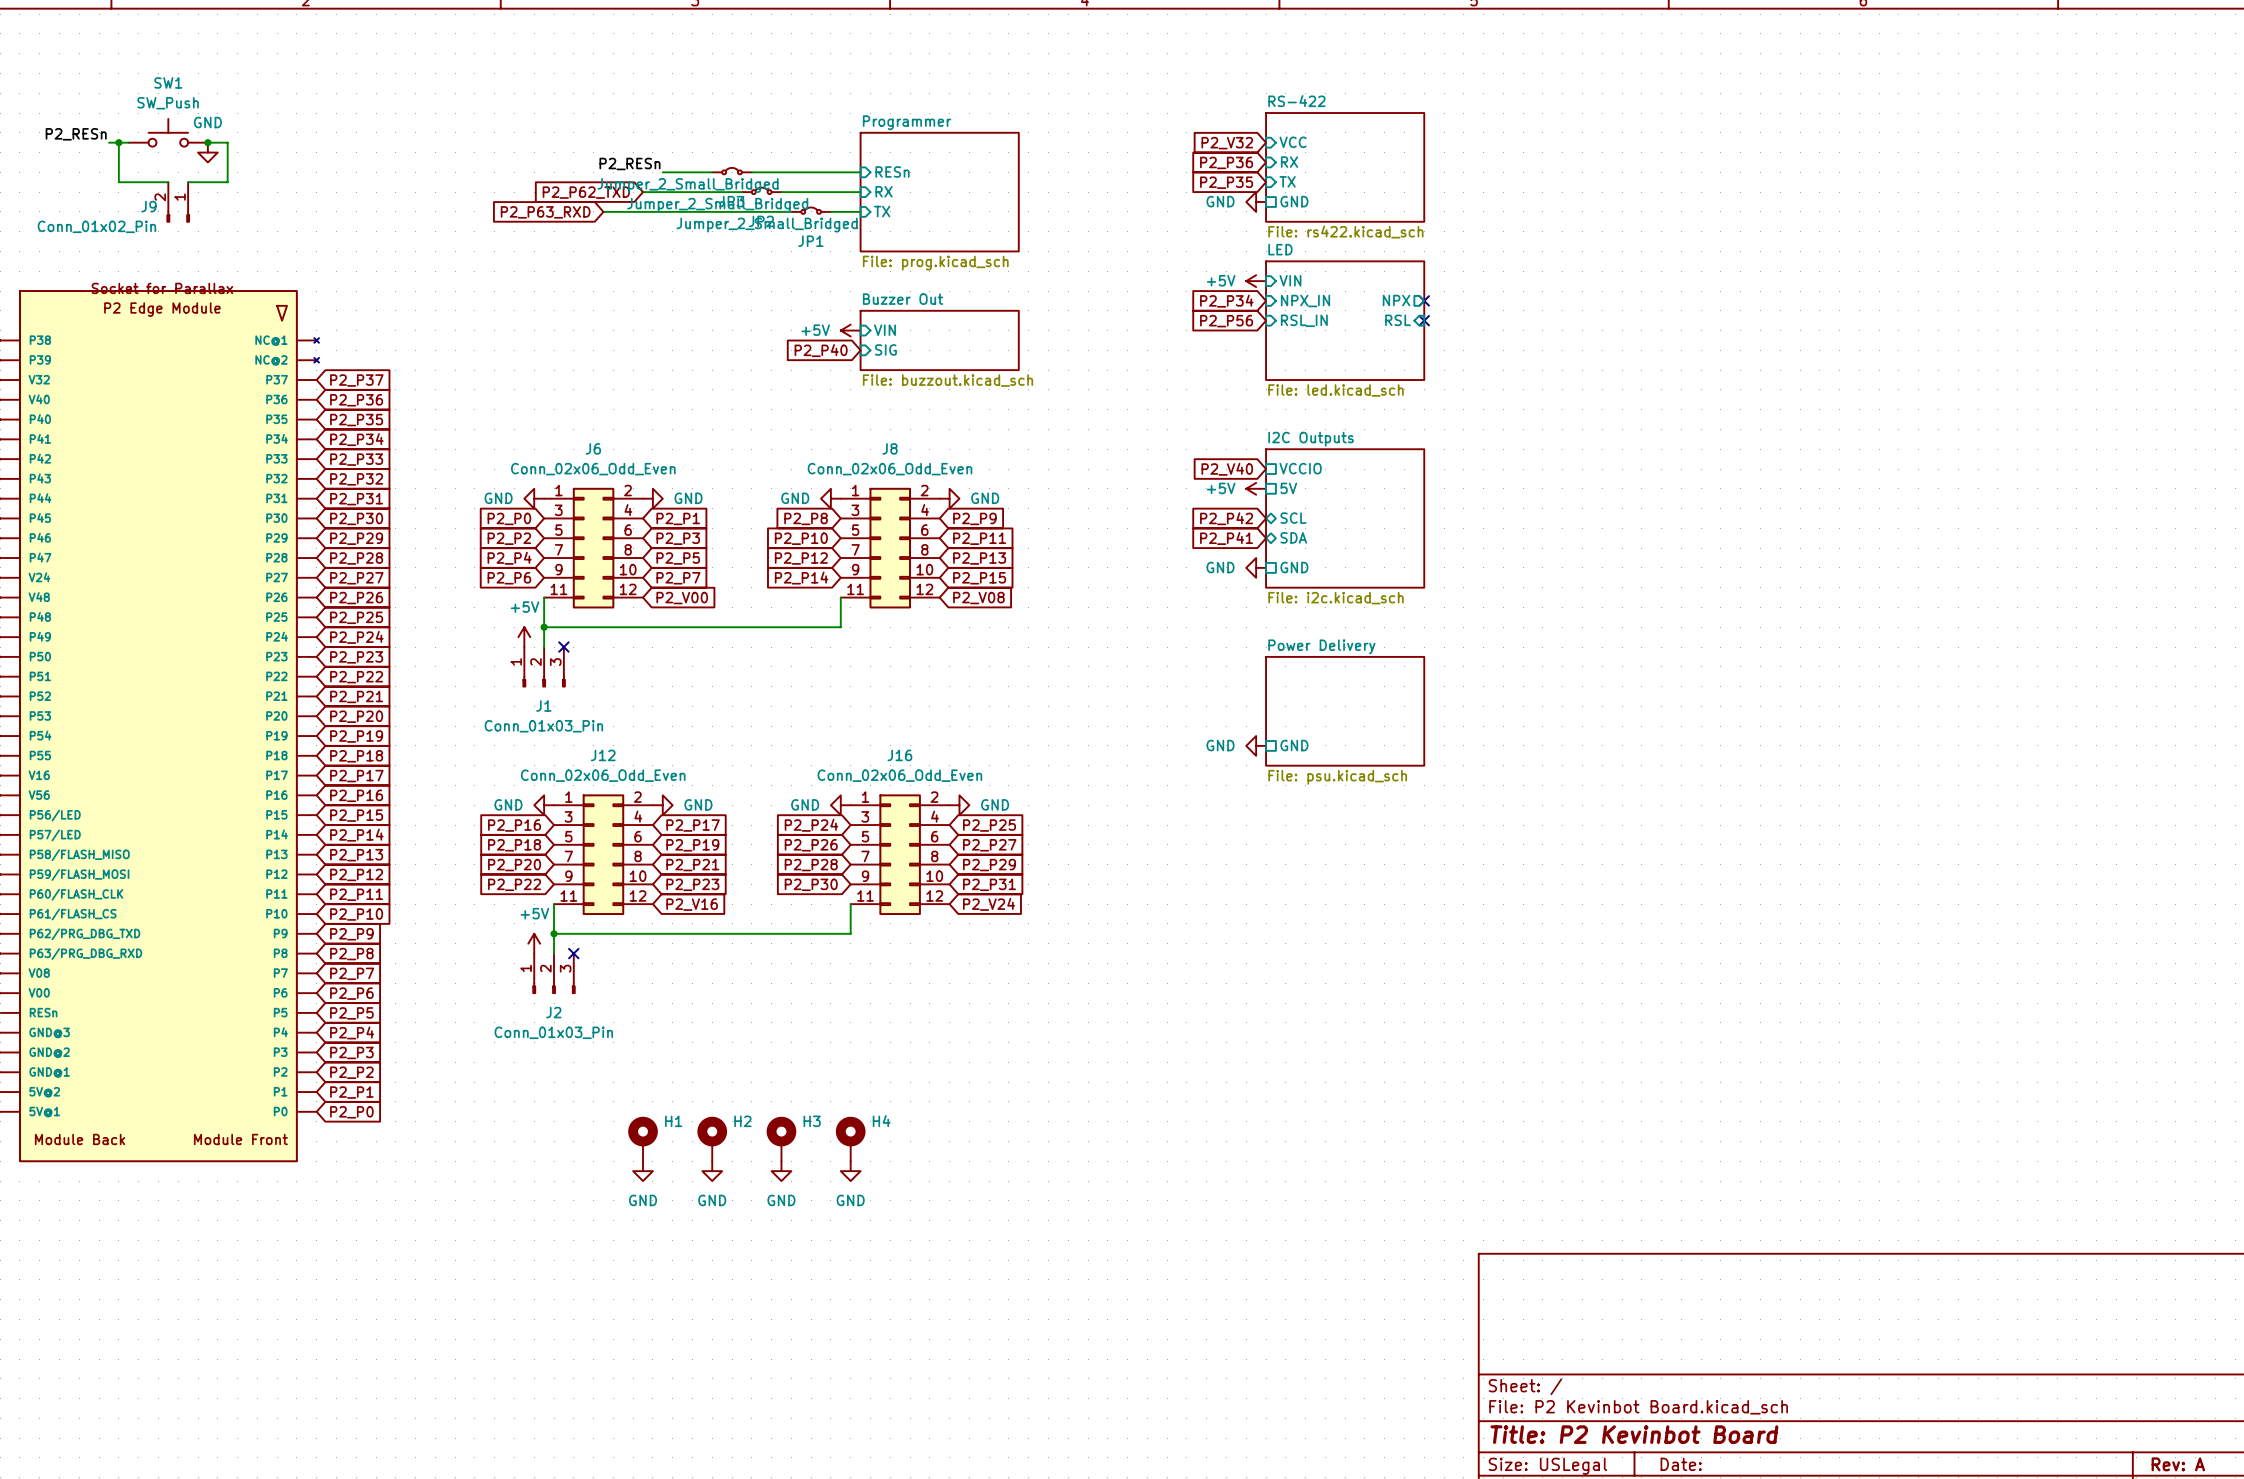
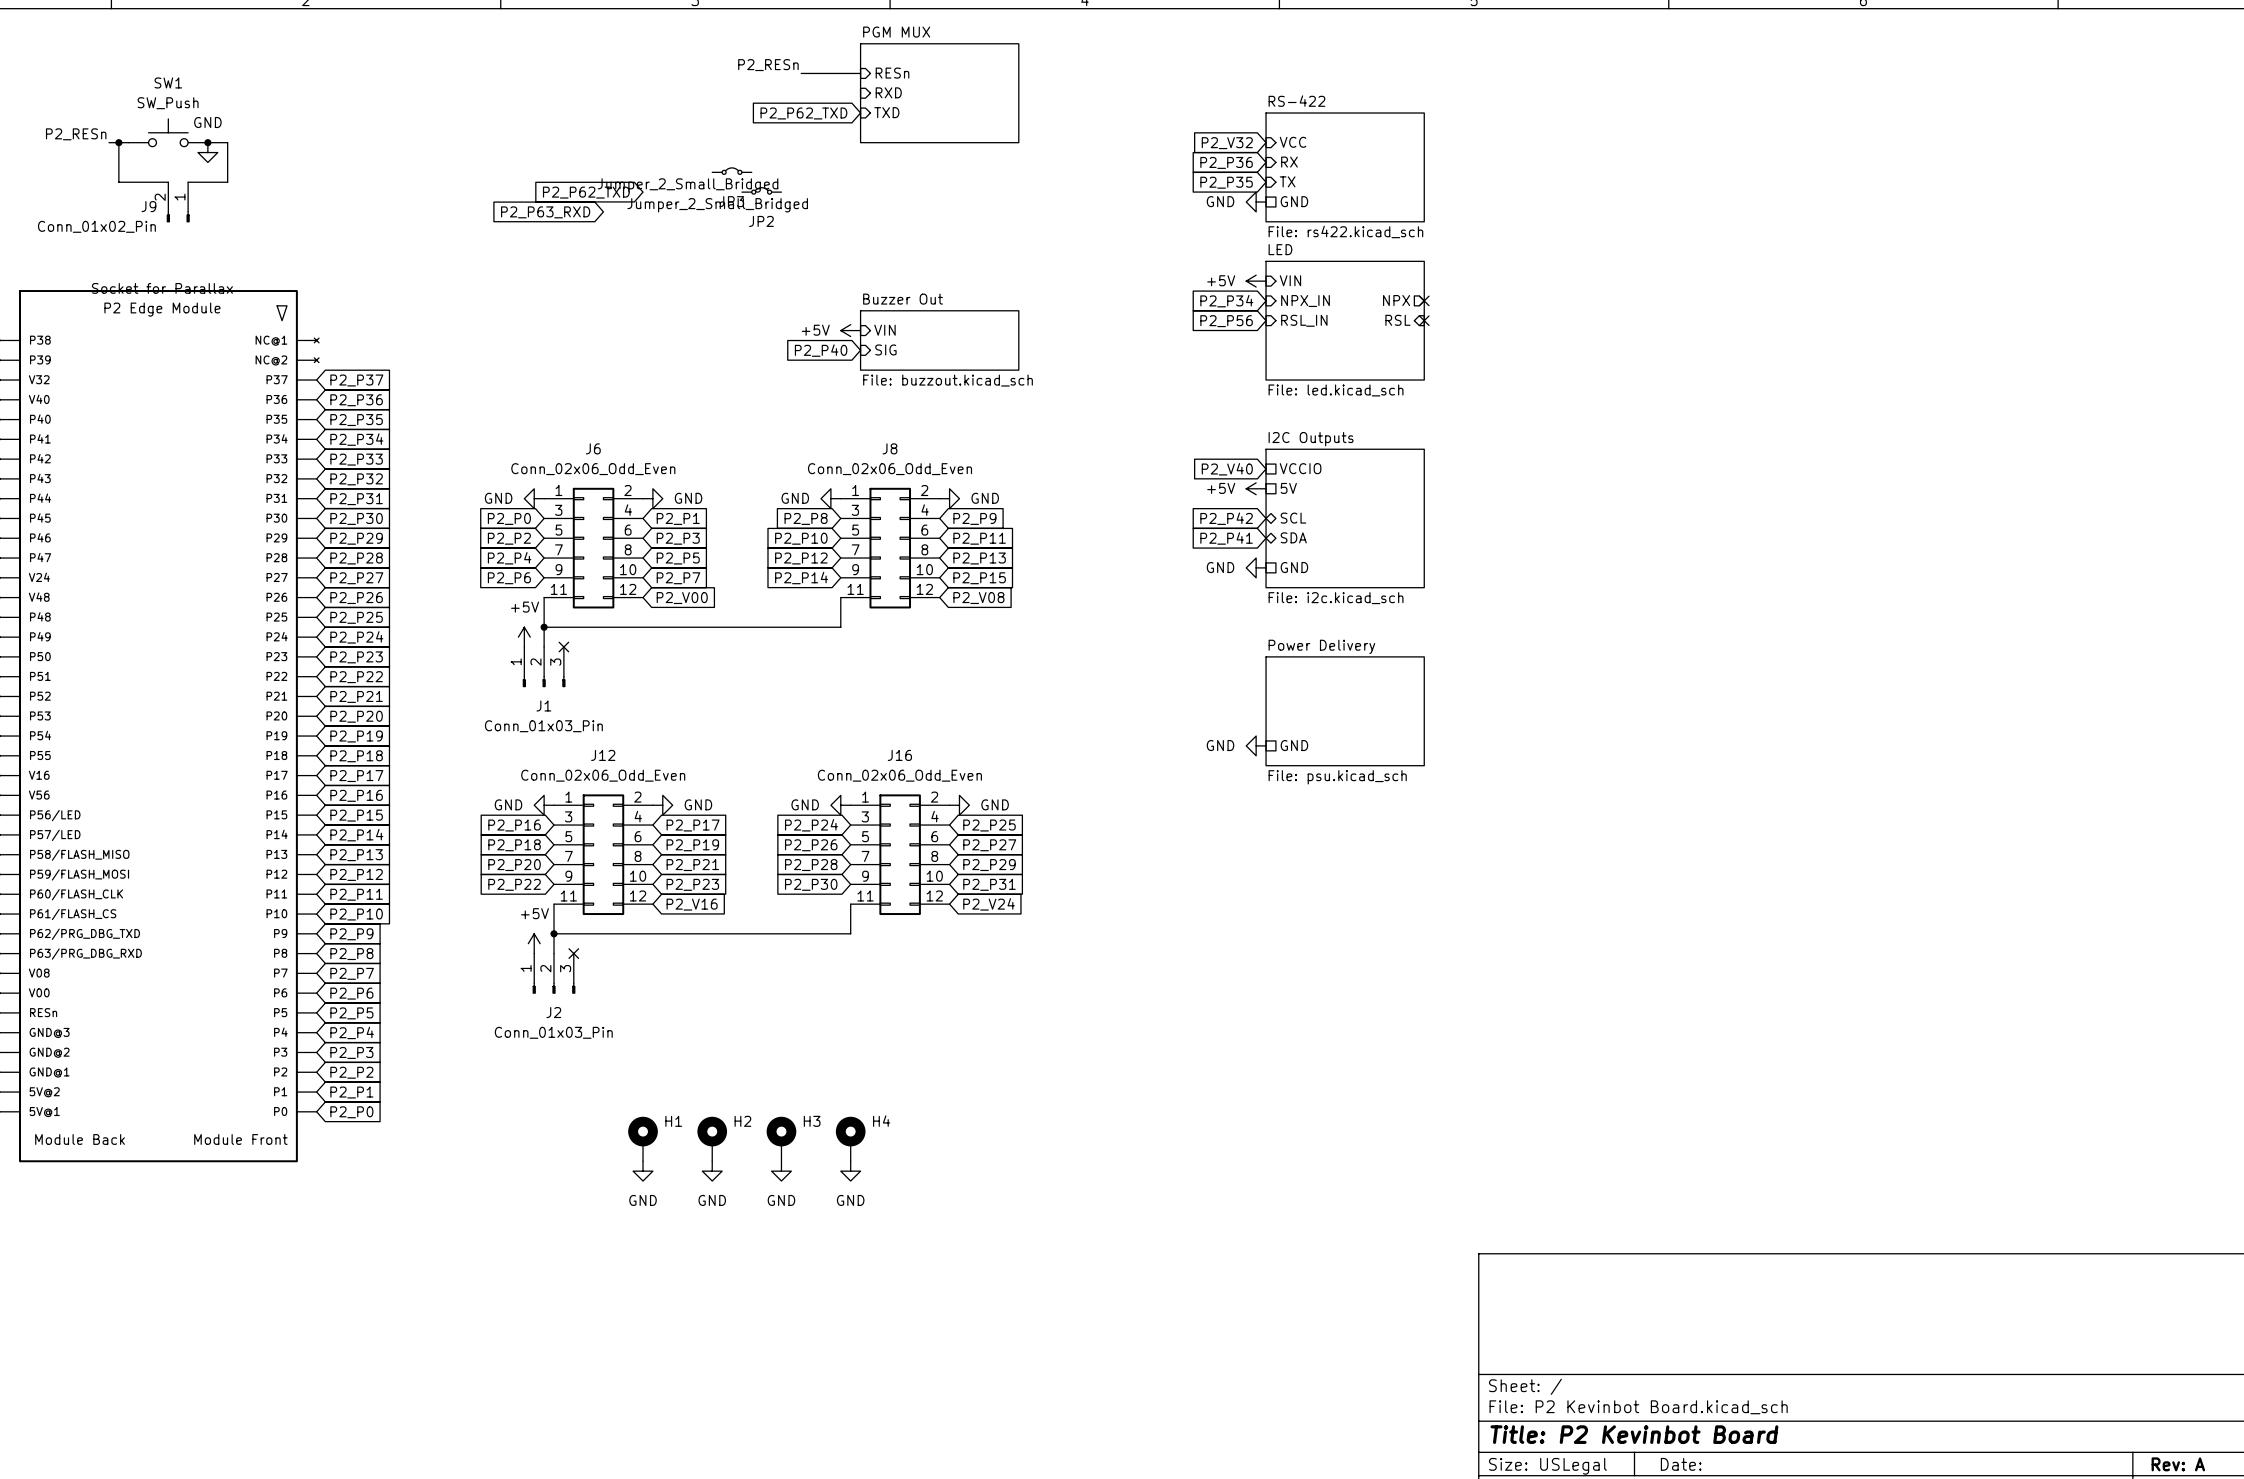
wire: none -> (801, 73) (860, 73)
sheet pin: none -> RXD (888, 92)
sheet PGM MUX: none -> (939, 93)
sheet pin: none -> TXD (886, 112)
global label: none -> P2_P62_TXD (803, 113)
label position: P2_RESn (629, 163) -> P2_RESn (768, 65)
sheet pin position: RESn (892, 171) -> RESn (892, 73)
wire: (662, 172) (712, 172) -> none
wire: (751, 172) (860, 172) -> none
sheet pin: RX (884, 191) -> none
wire: (643, 192) (741, 192) -> none
wire: (781, 192) (860, 192) -> none
sheet Programmer: File: prog.kicad_sch (939, 192) -> none
JP1: Jumper_2_Small_Bridged (811, 210) -> none
wire: (603, 211) (791, 211) -> none
wire: (830, 211) (860, 211) -> none
sheet pin: TX (882, 211) -> none

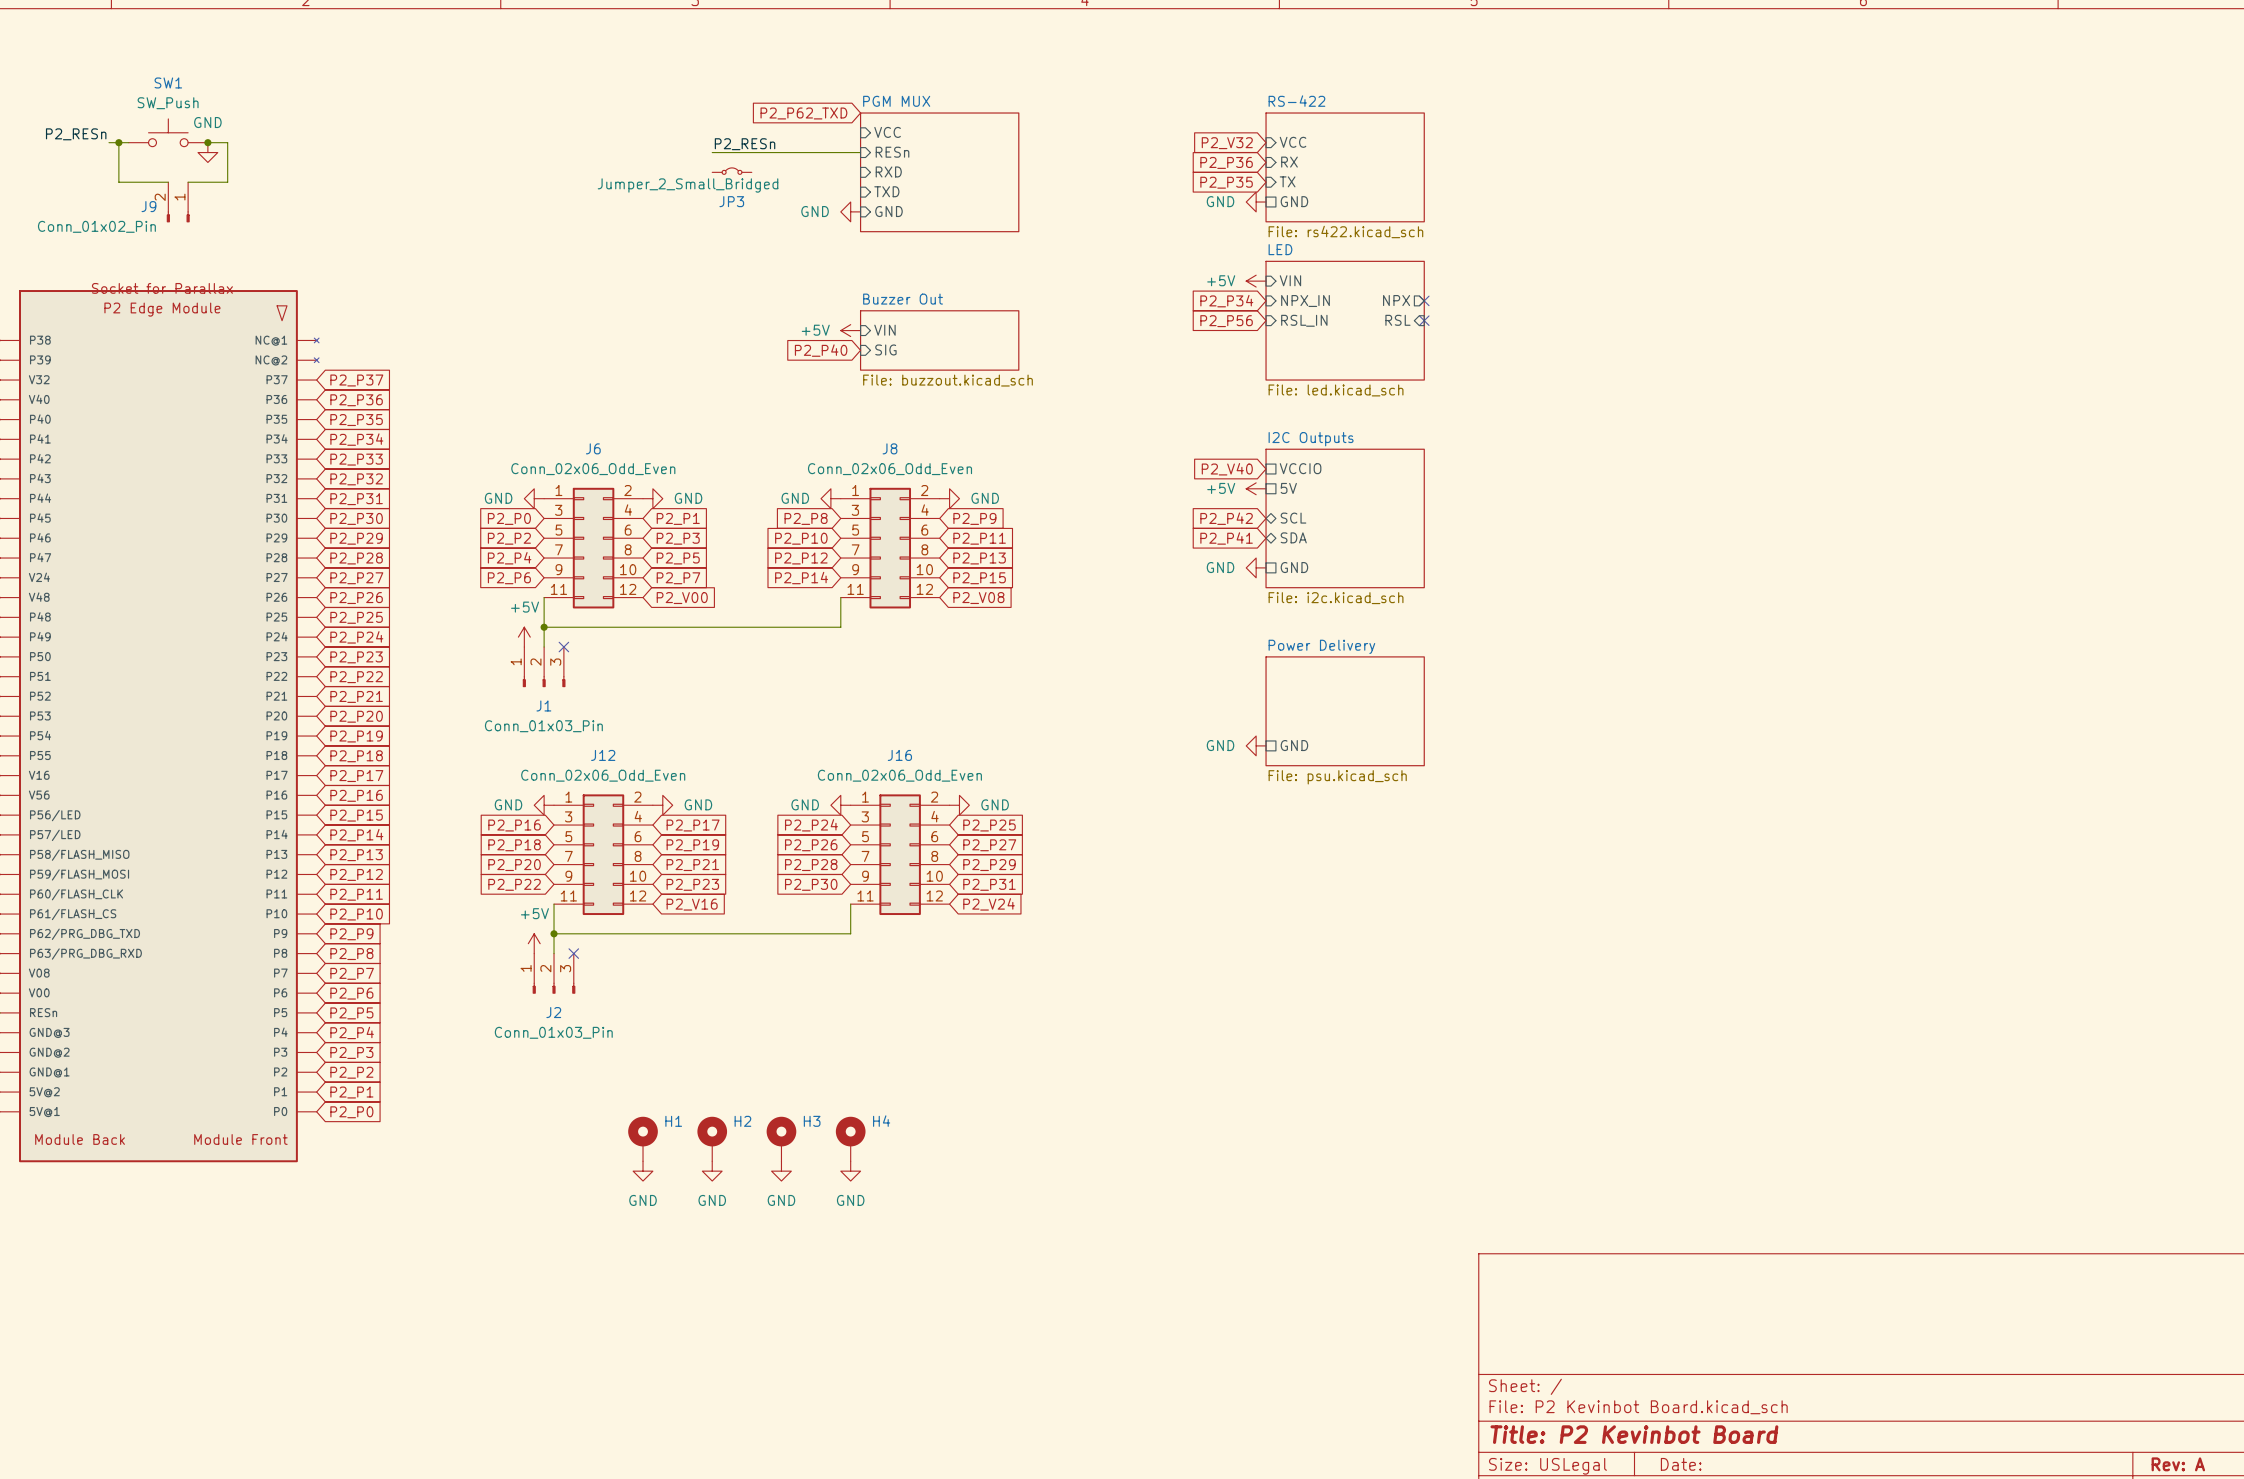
label position: P2_RESn (768, 65) -> P2_RESn (745, 144)
wire: (801, 73) (860, 73) -> none
sheet pin position: RESn (892, 73) -> RESn (892, 152)
sheet pin position: RXD (888, 92) -> RXD (888, 171)
sheet PGM MUX: (939, 93) -> none
sheet pin position: TXD (886, 112) -> TXD (886, 191)
sheet pin: none -> VCC (887, 132)
wire: none -> (712, 152) (860, 152)
sheet PGM MUX: none -> (939, 172)
JP2: Jumper_2_Small_Bridged (761, 190) -> none
global label: P2_P62_TXD (586, 192) -> none
power symbol: none -> GND (850, 211)
sheet pin: none -> GND (888, 211)
global label: P2_P63_RXD (545, 212) -> none

